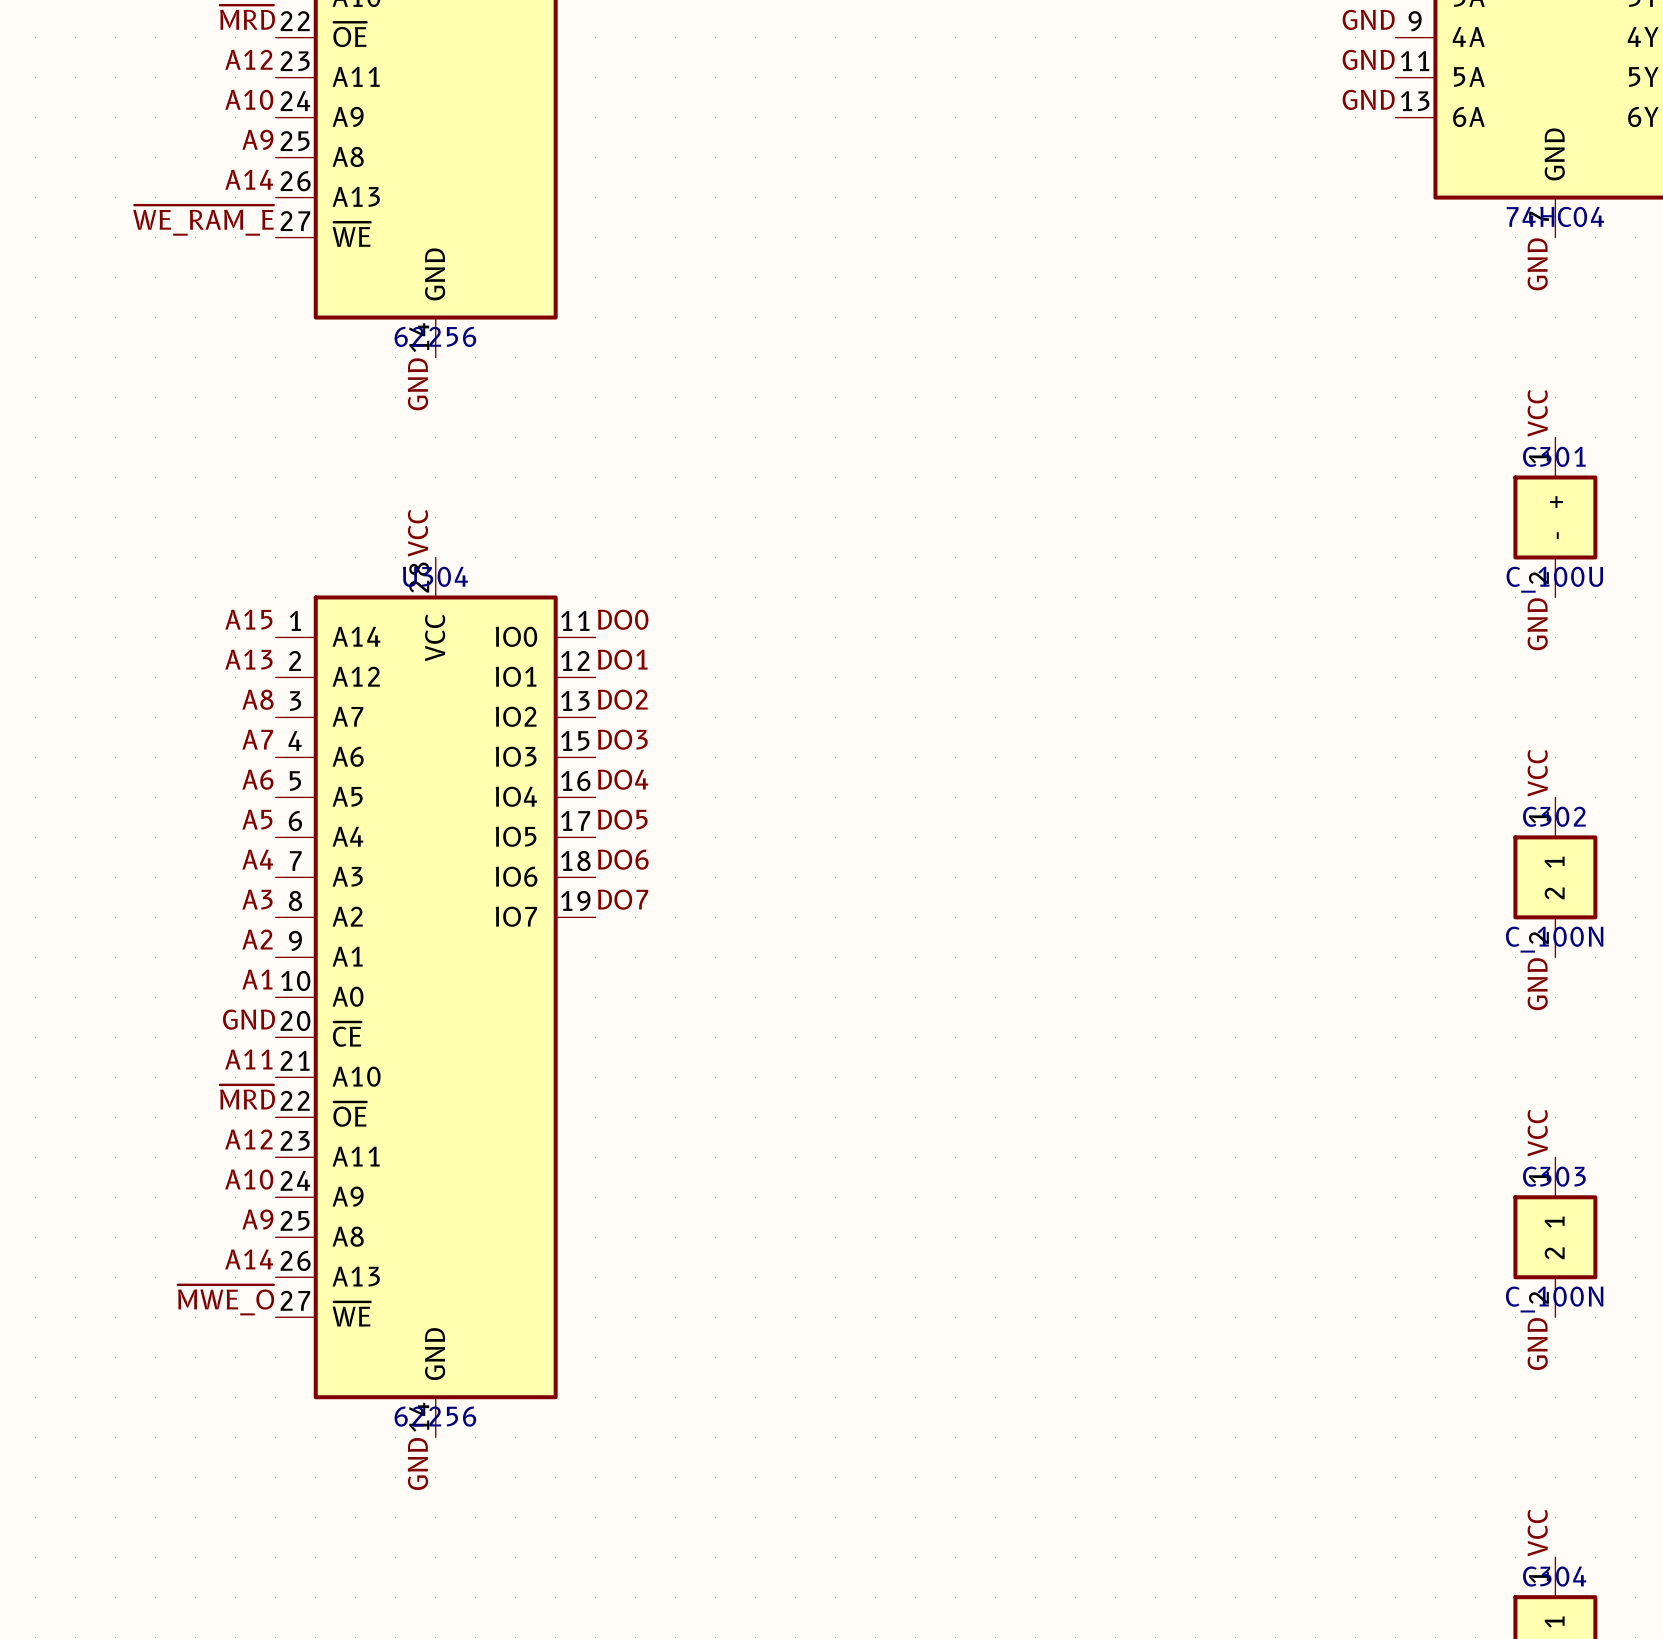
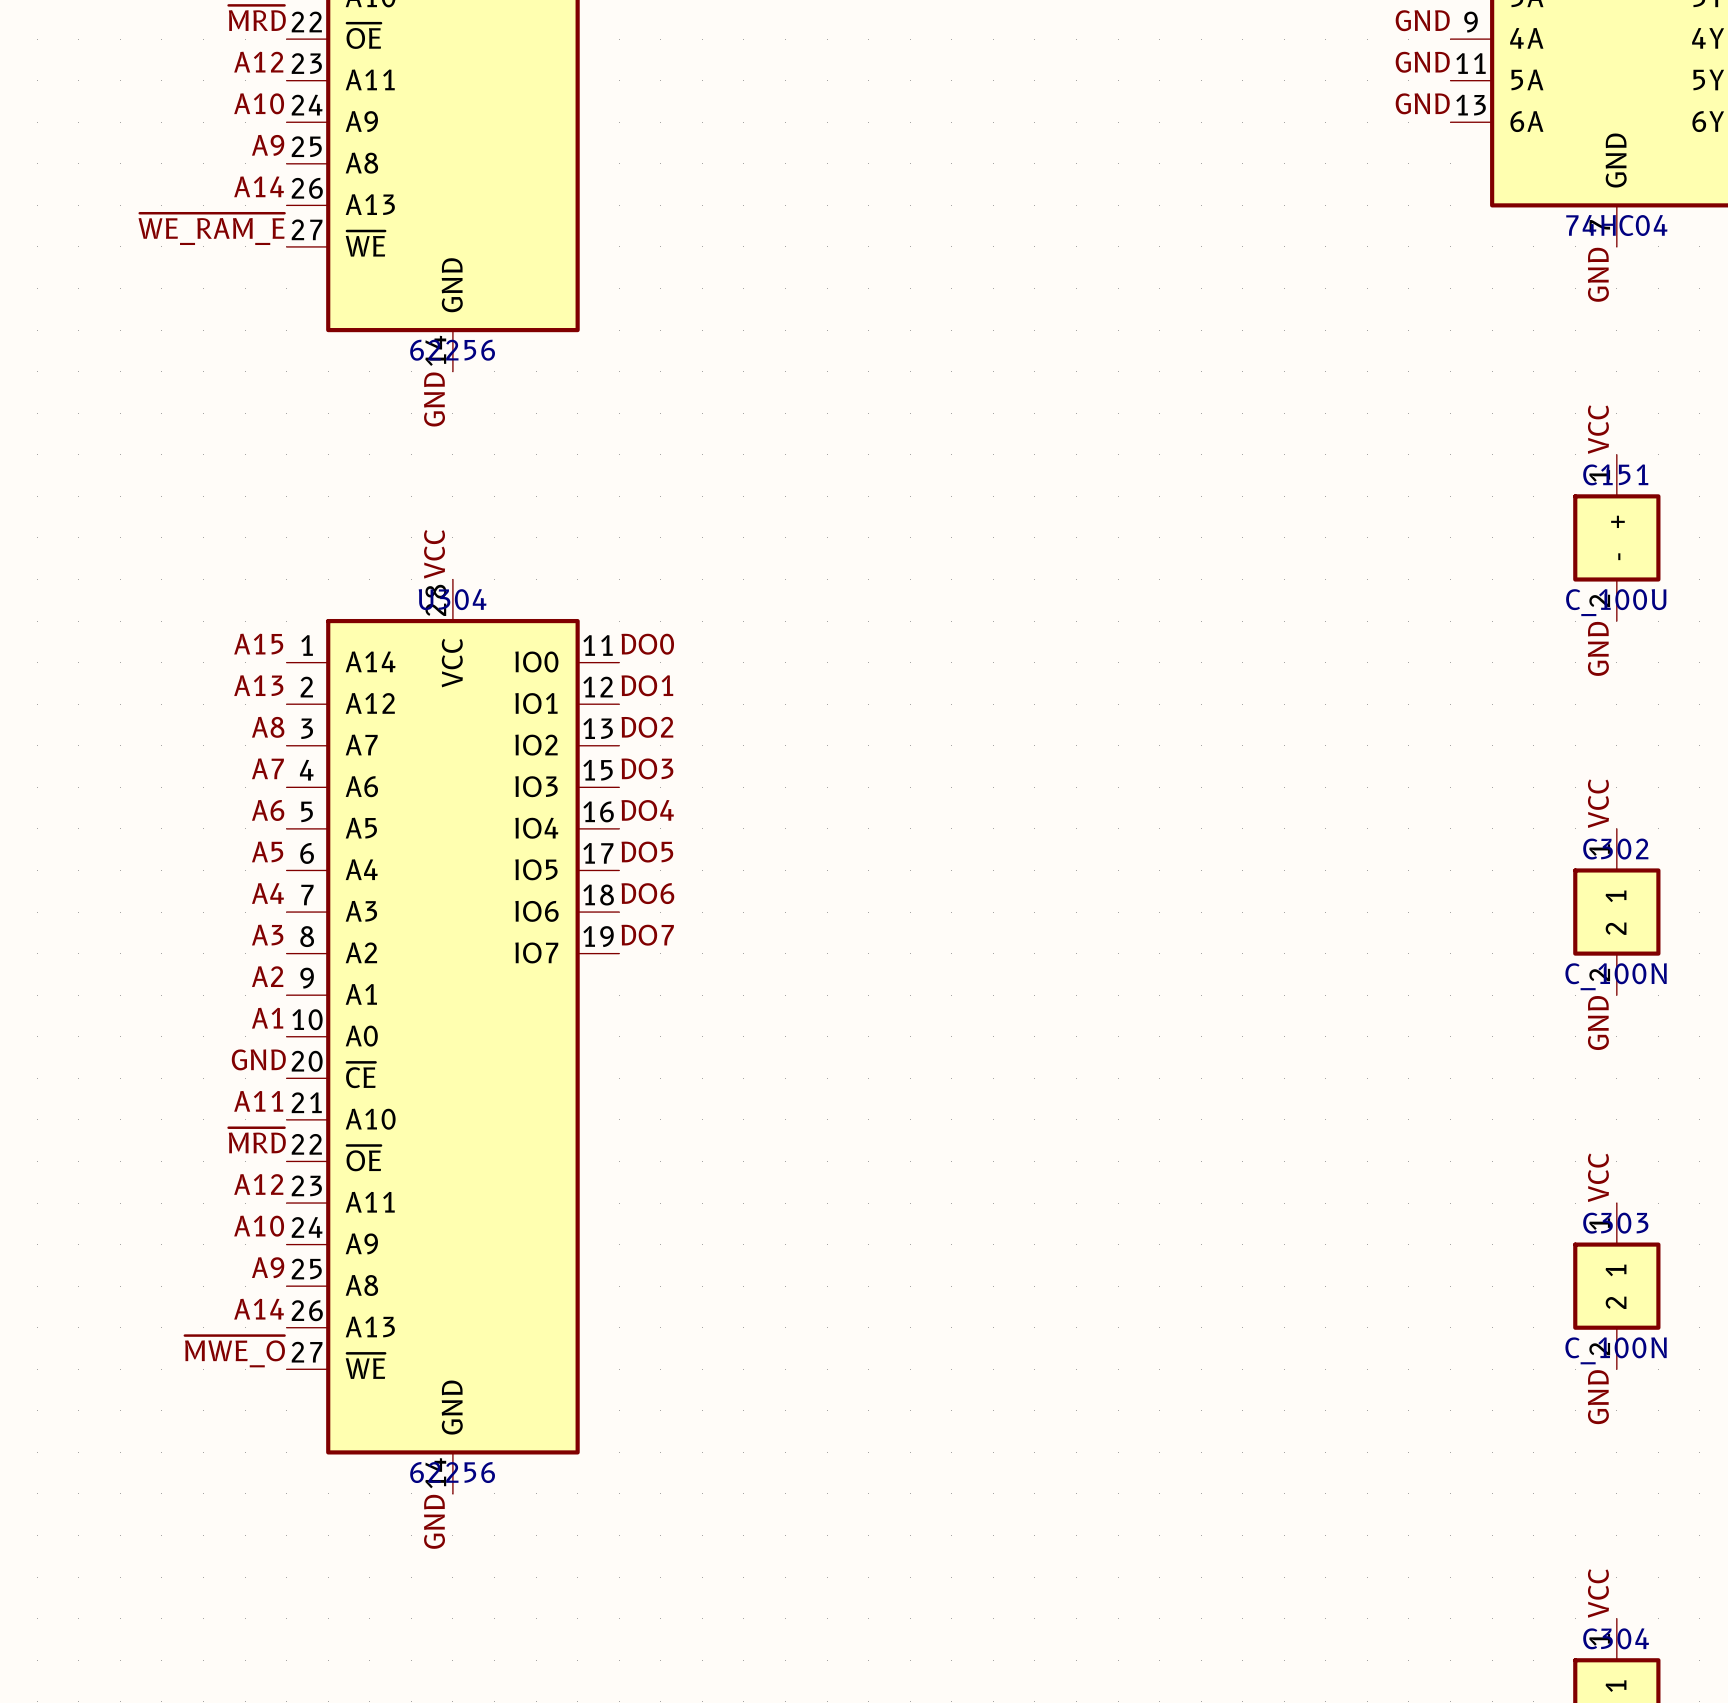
C301 name: C301 (1554, 456) -> C151 (1615, 474)

